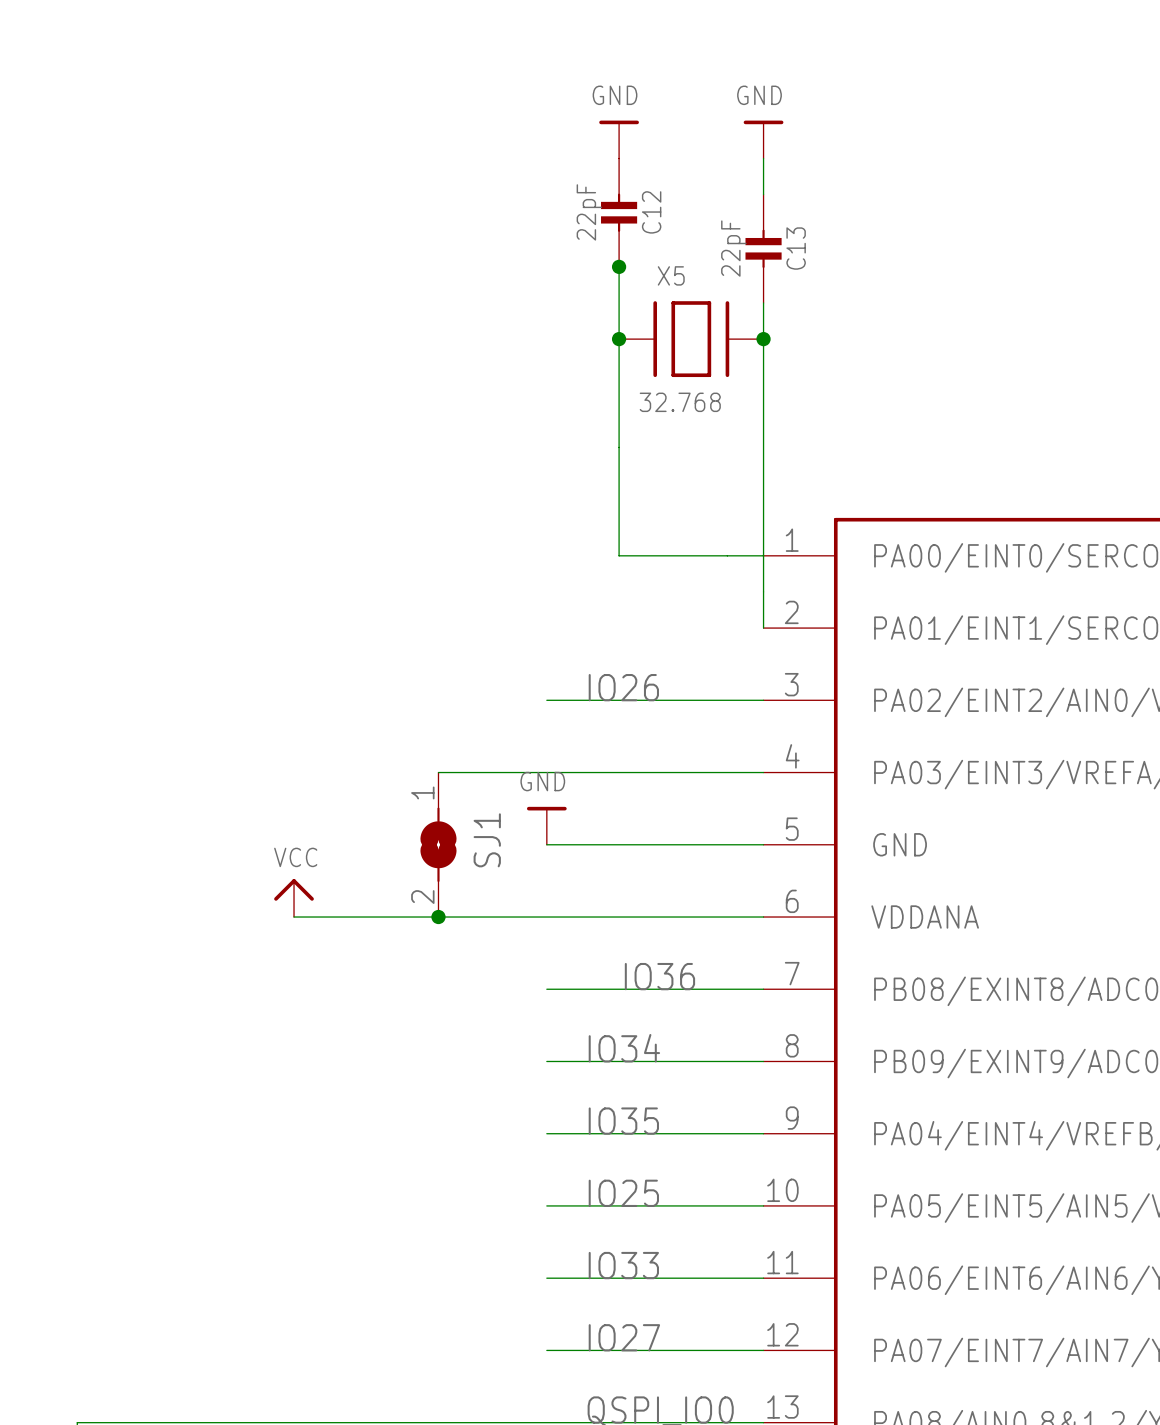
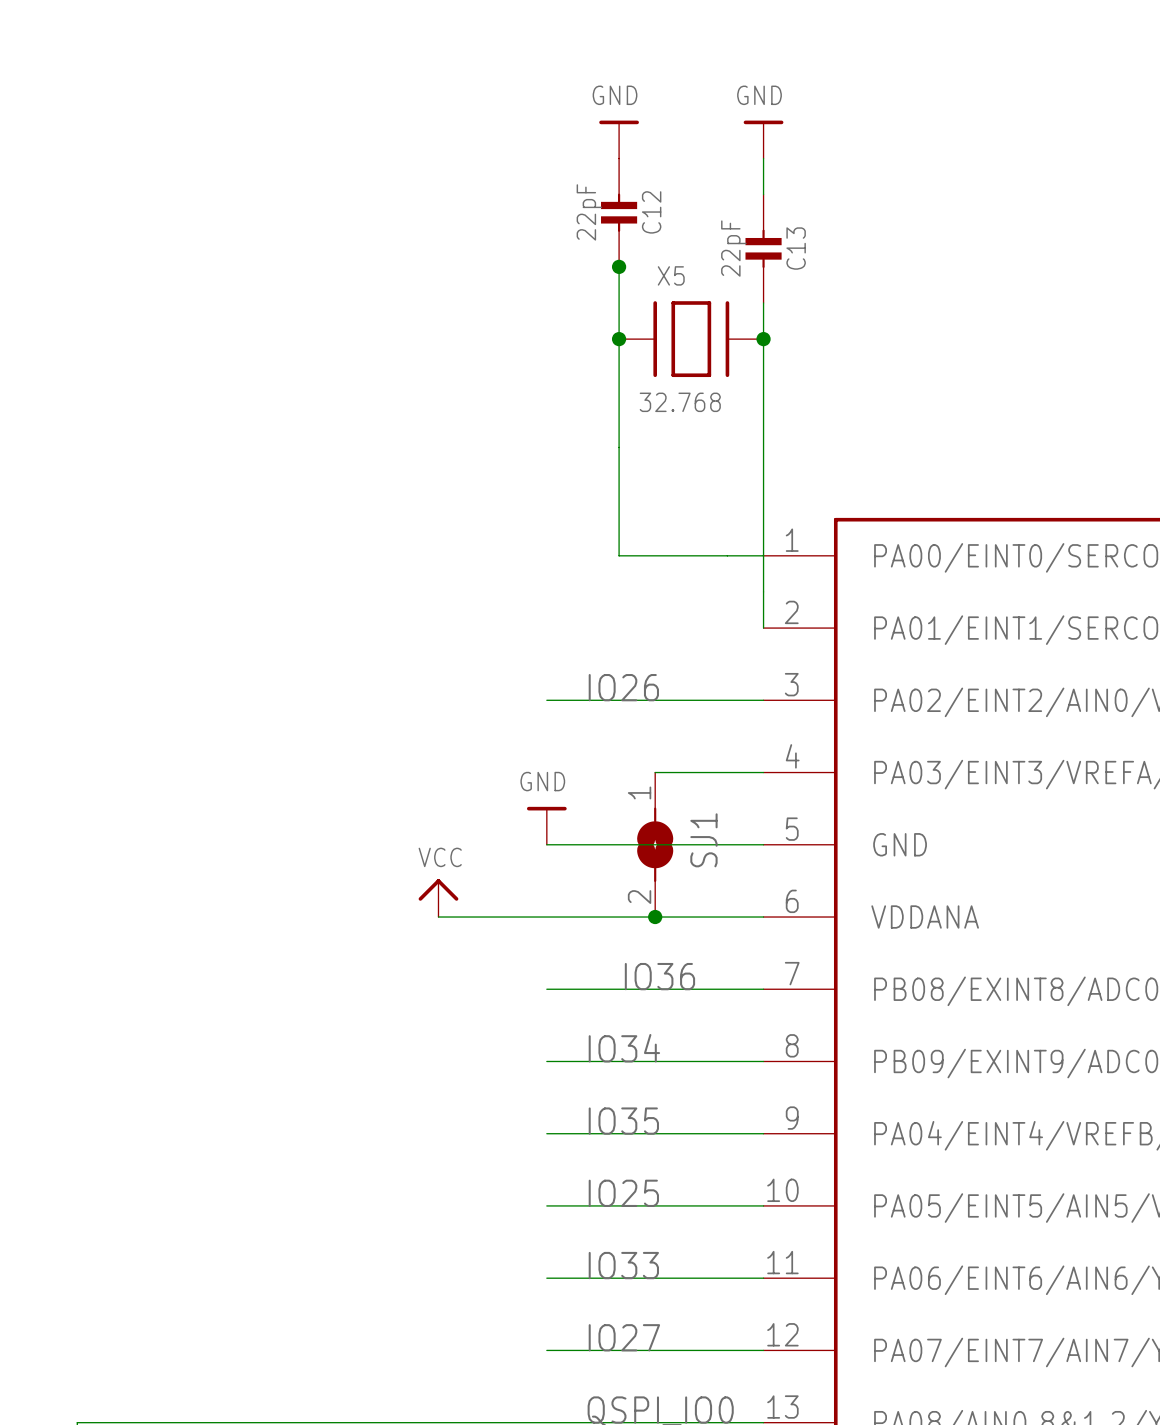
wire: (438, 772) (655, 772) -> none
SJ1 position: (438, 844) -> (655, 844)
power symbol position: VCC (294, 898) -> VCC (438, 898)
wire: (294, 917) (438, 917) -> none
junction: (438, 917) -> none
junction: none -> (655, 917)

